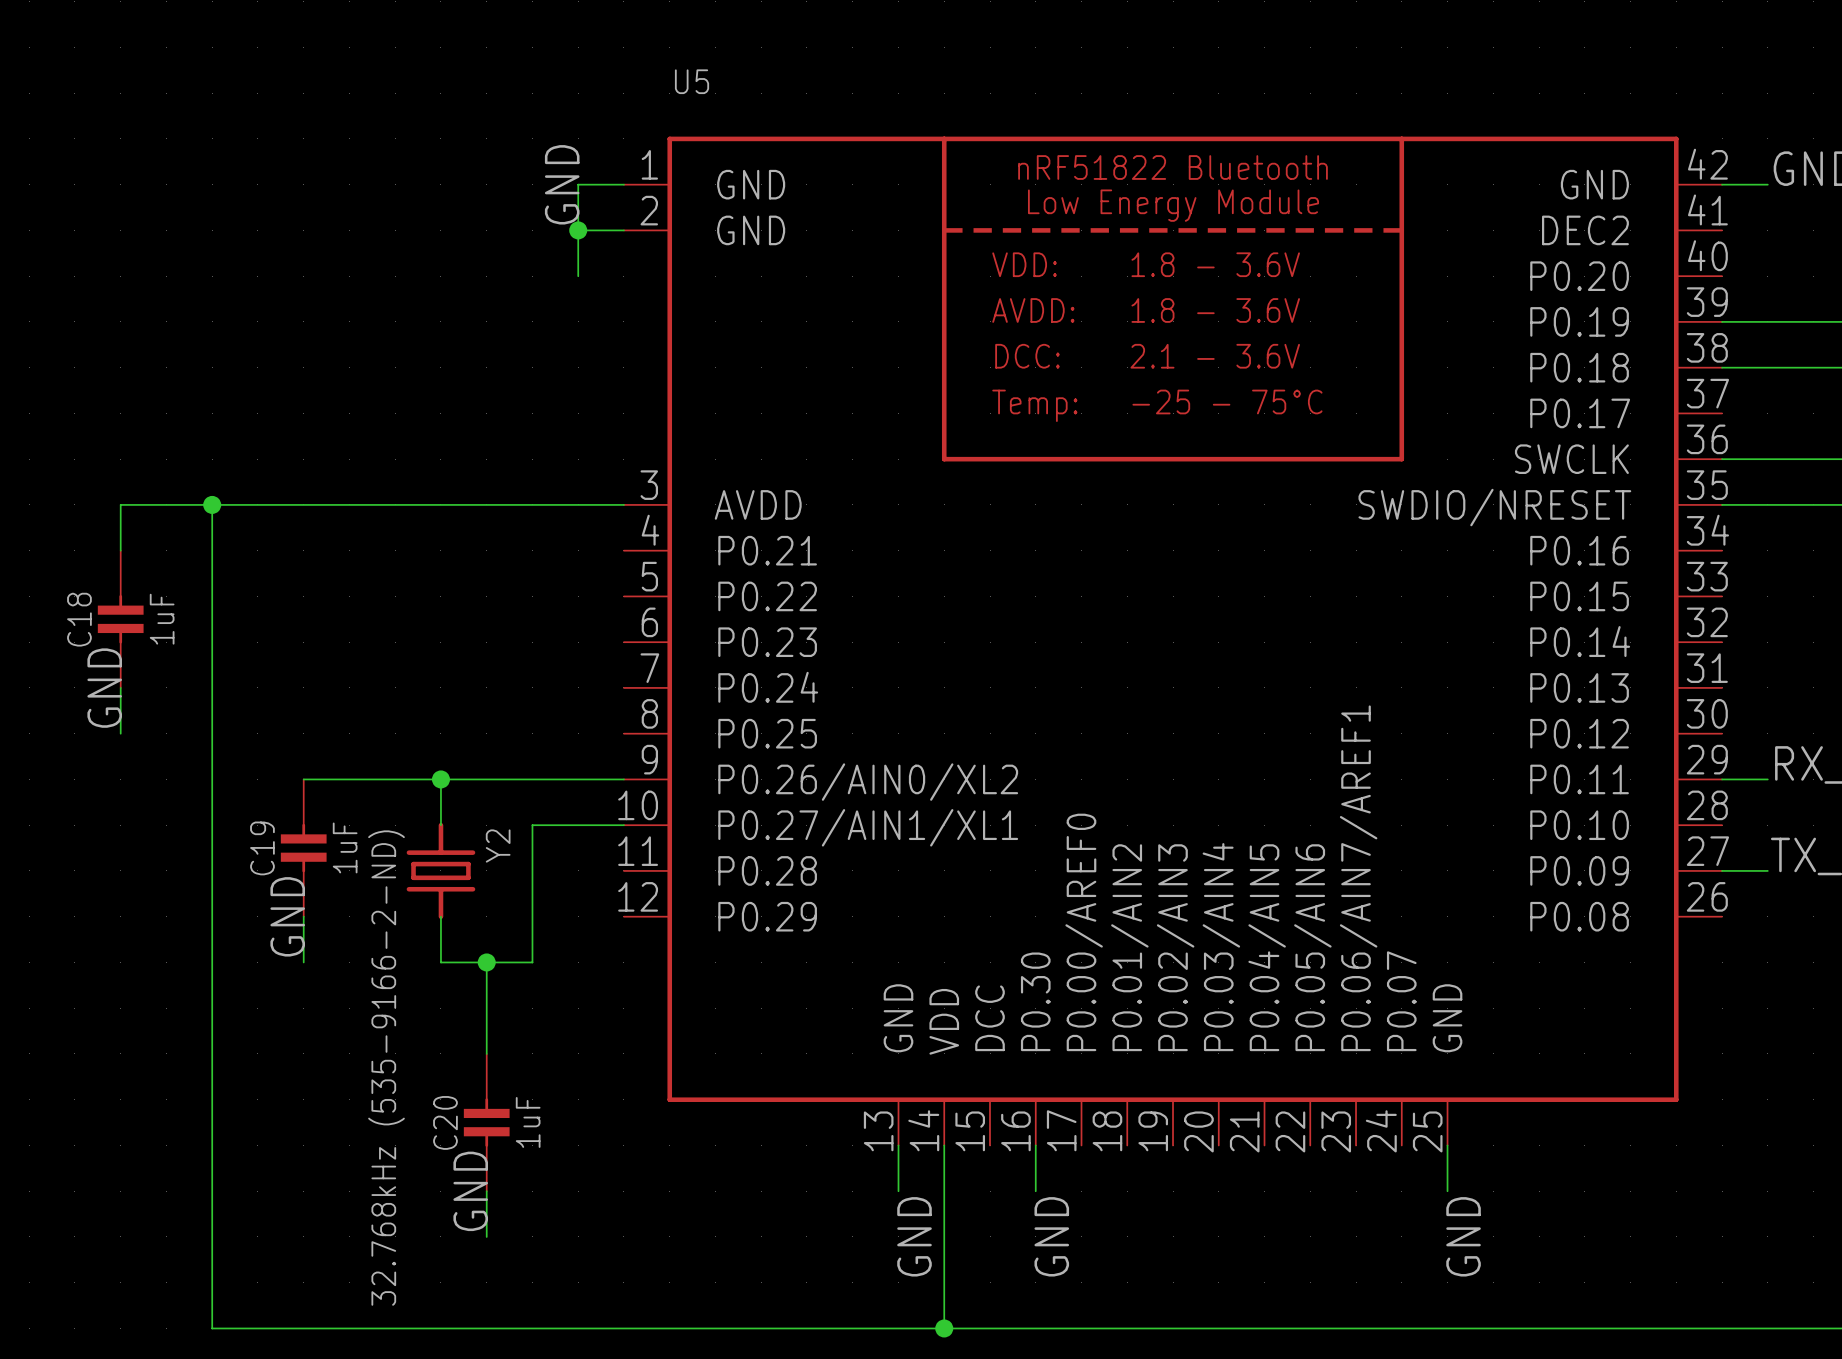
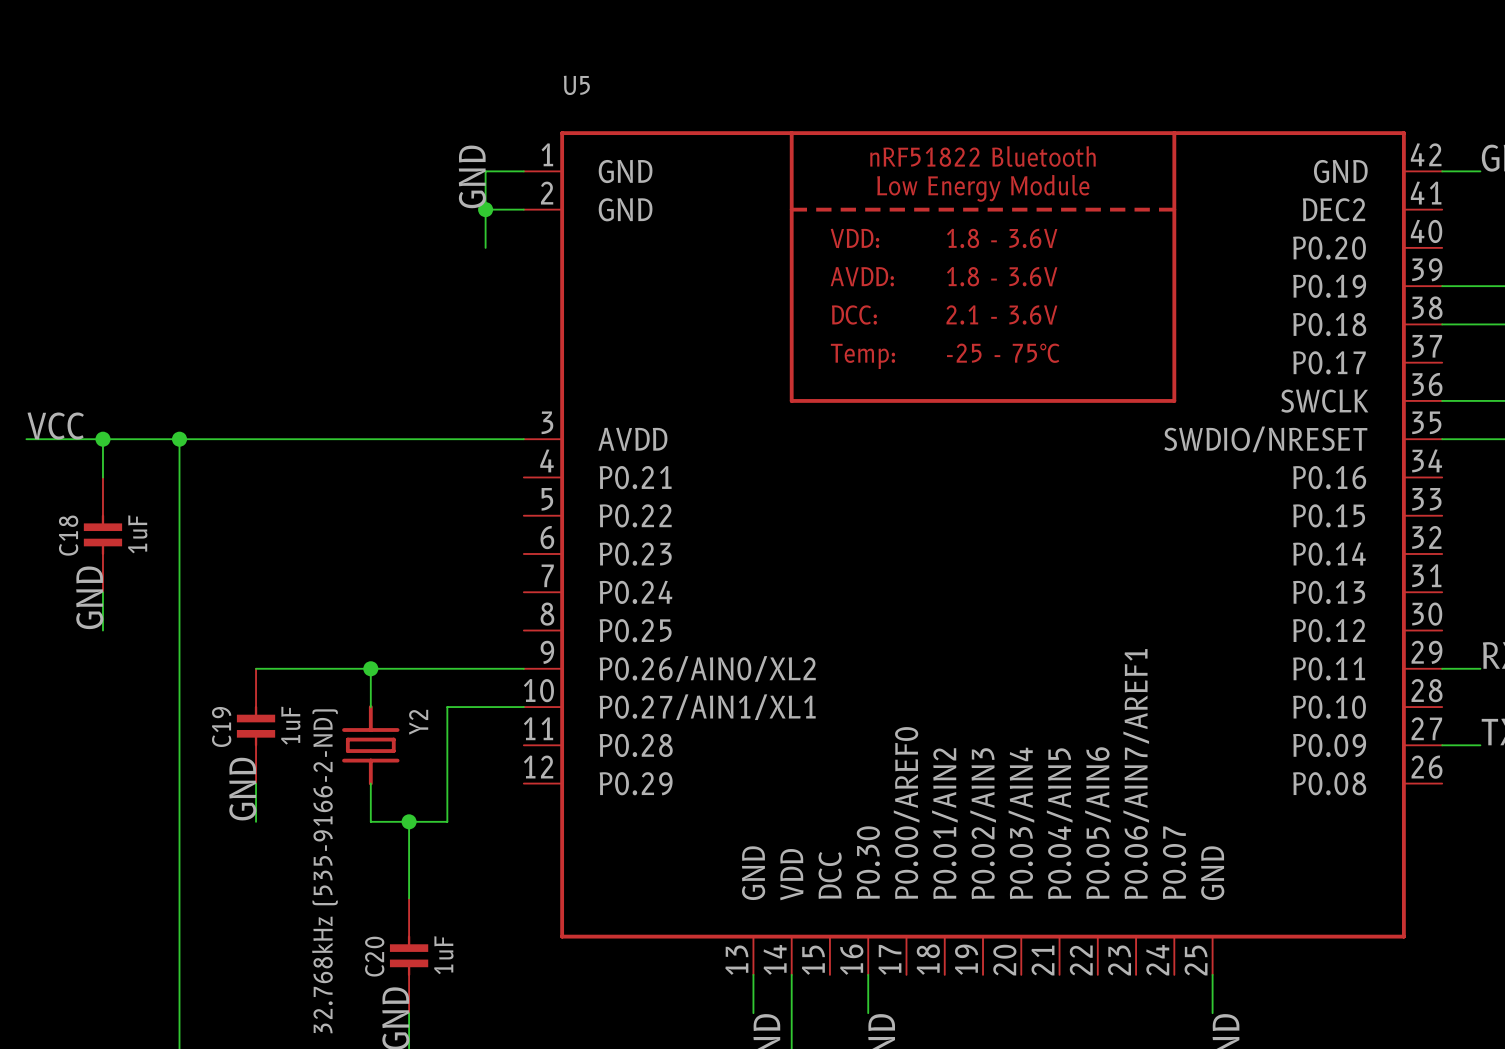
label: none -> VCC (55, 425)
wire: none -> (26, 439) (102, 439)
junction: none -> (102, 439)

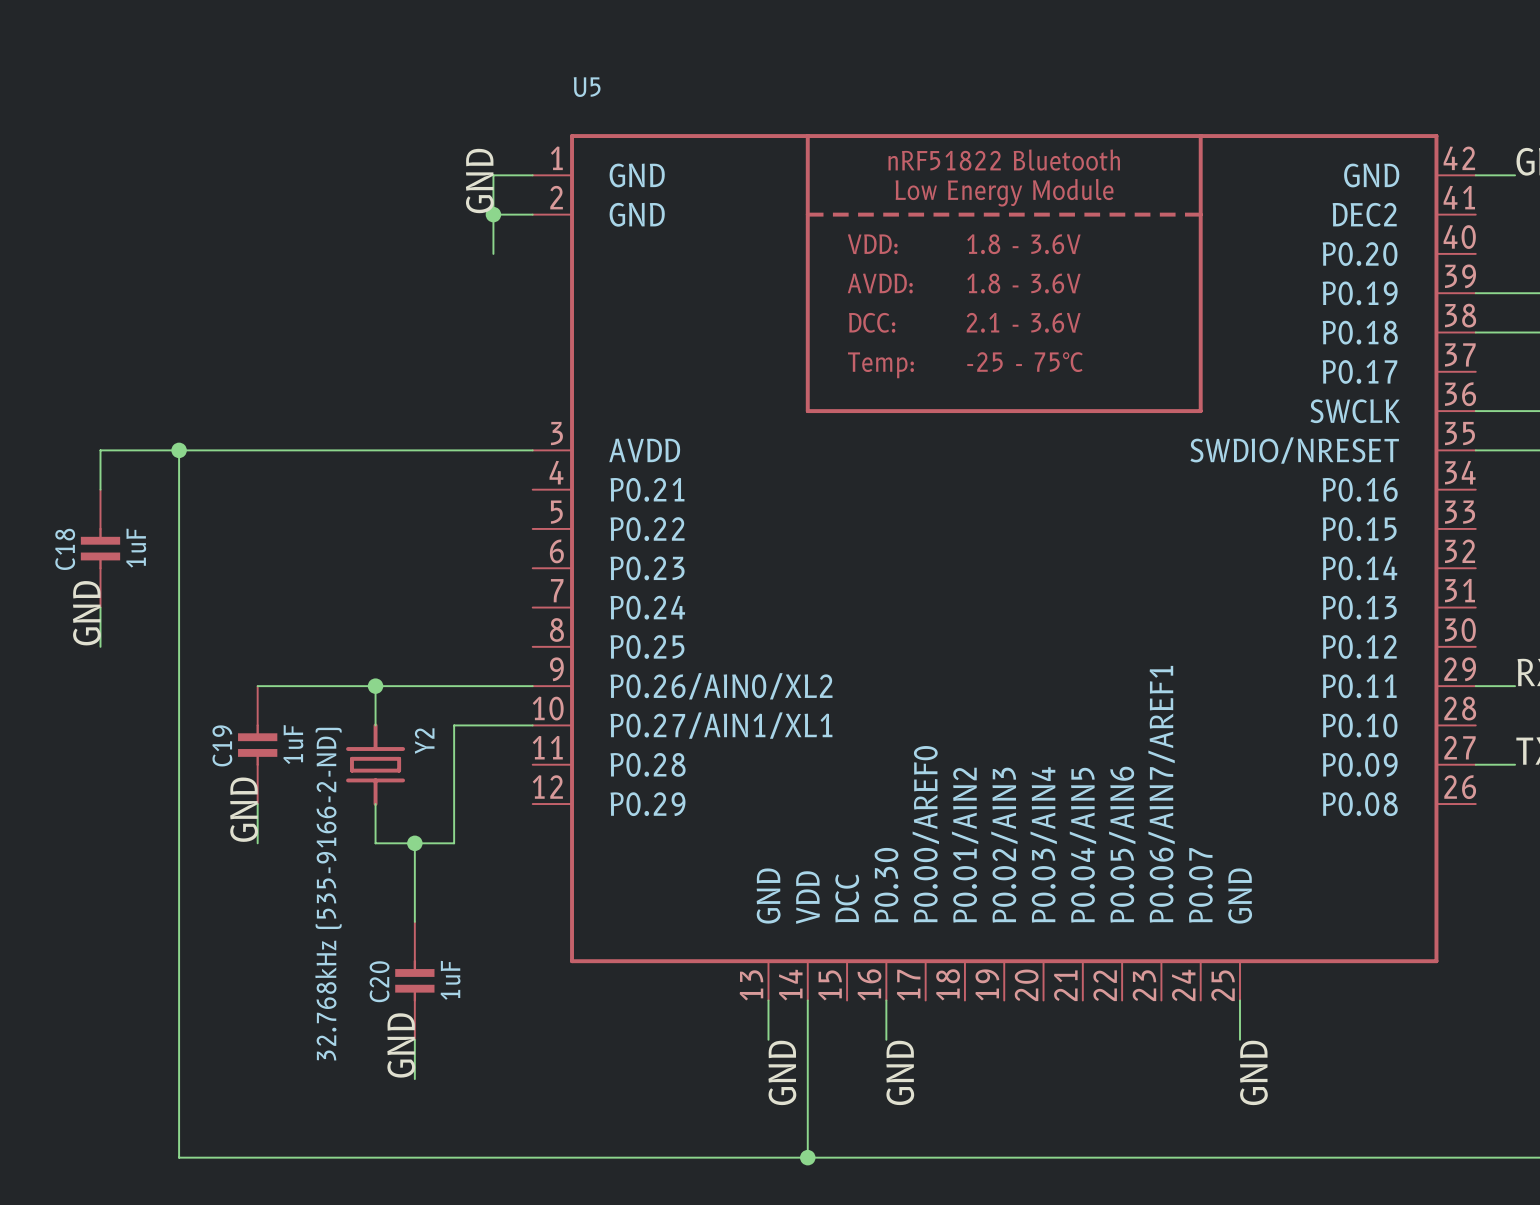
label: VCC (55, 425) -> none
wire: (26, 439) (102, 439) -> none
junction: (102, 439) -> none

